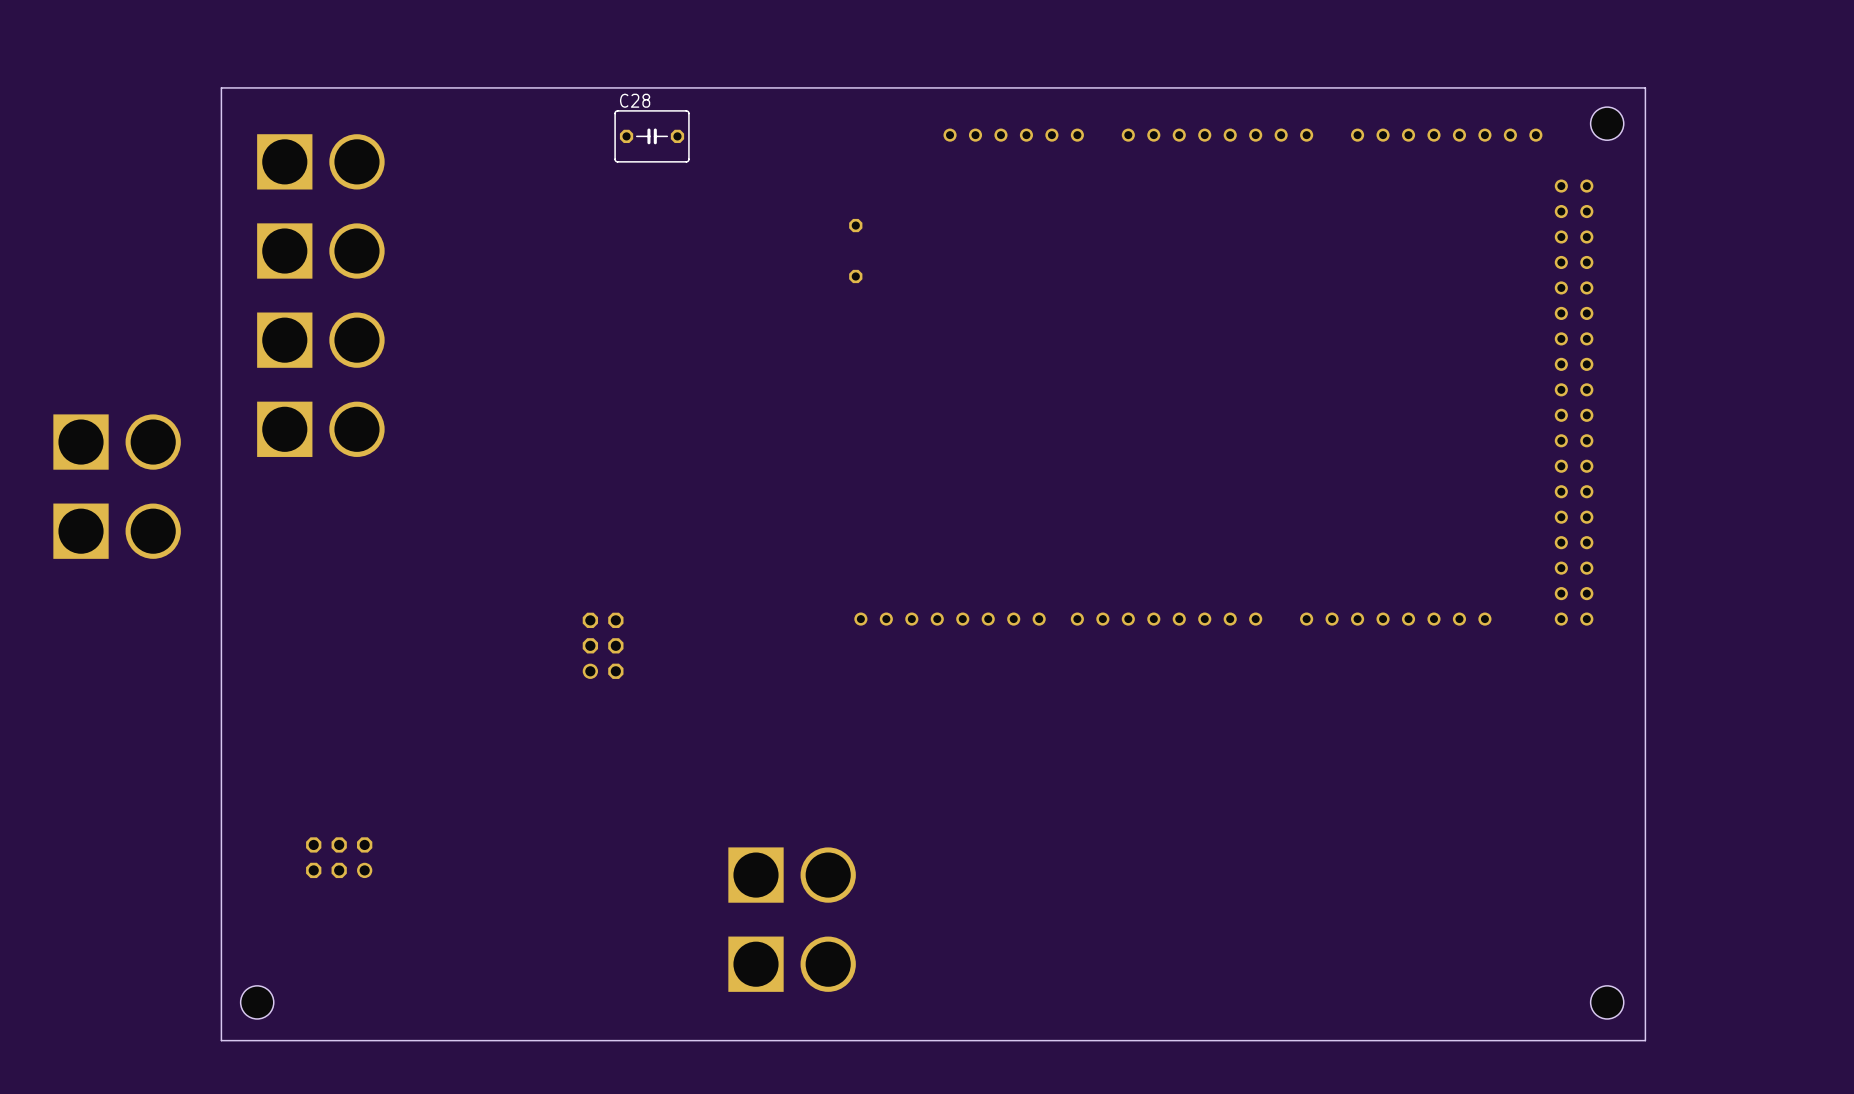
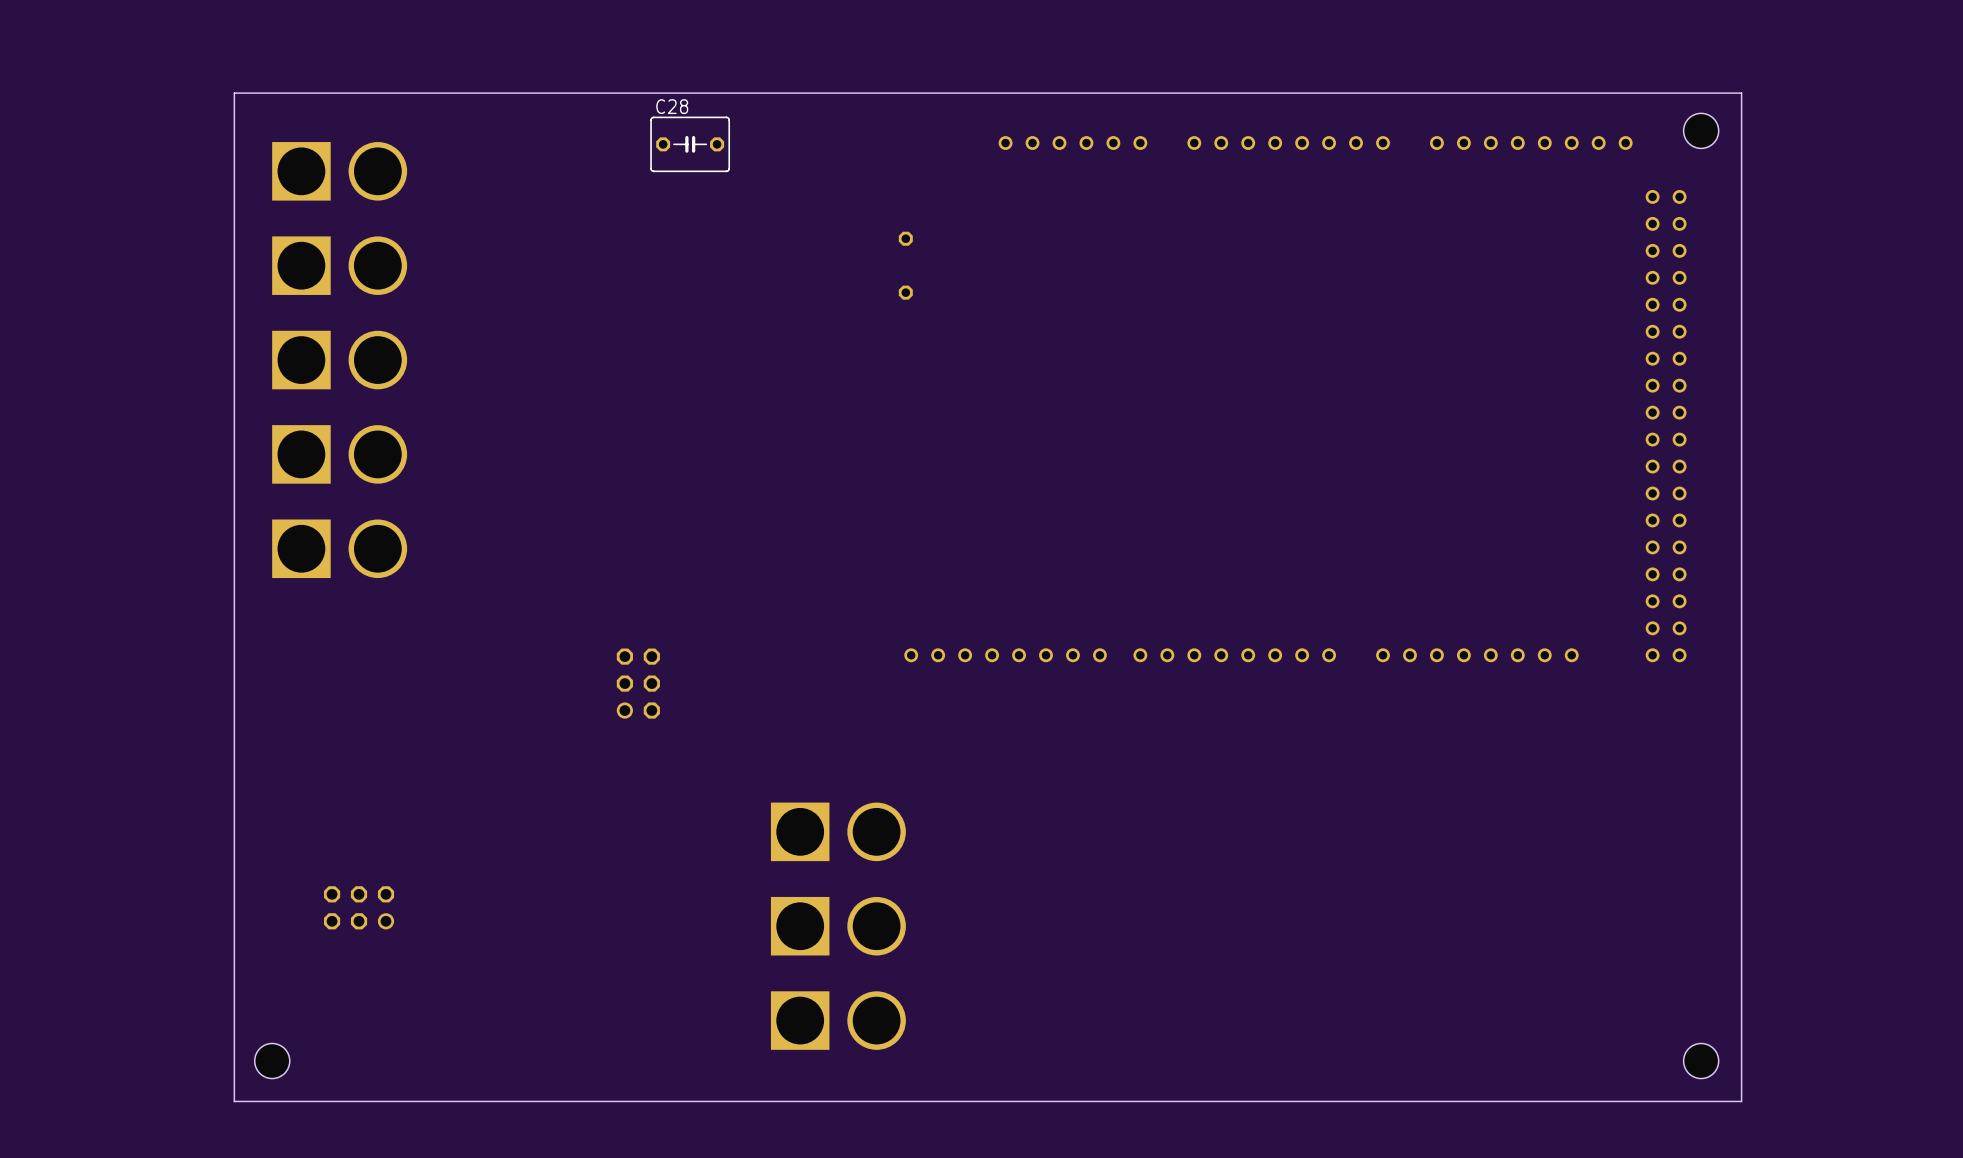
part: (117, 442) -> none
part: none -> (339, 548)
part: (117, 531) -> none
part: none -> (838, 831)

